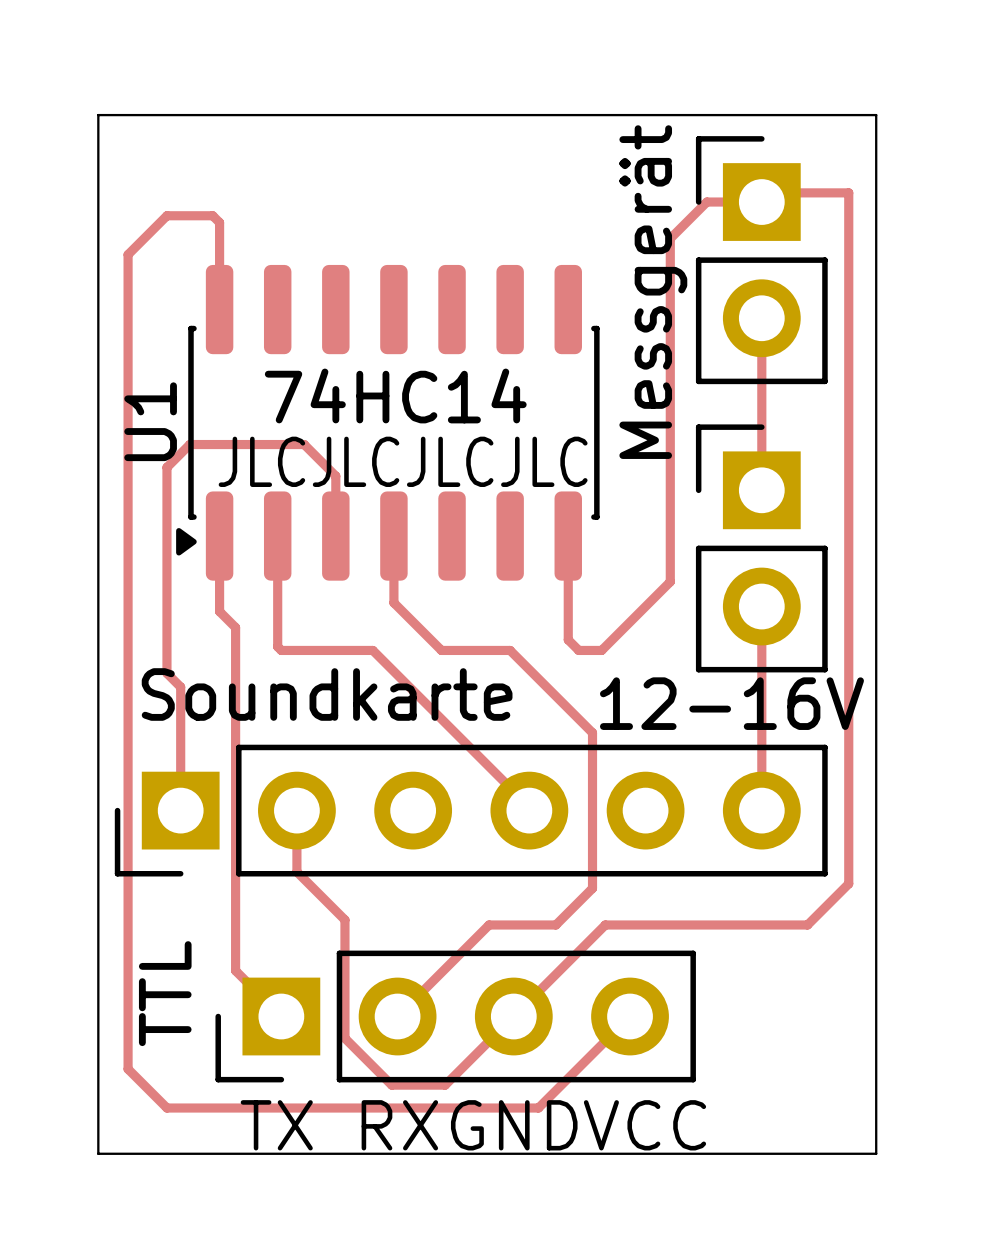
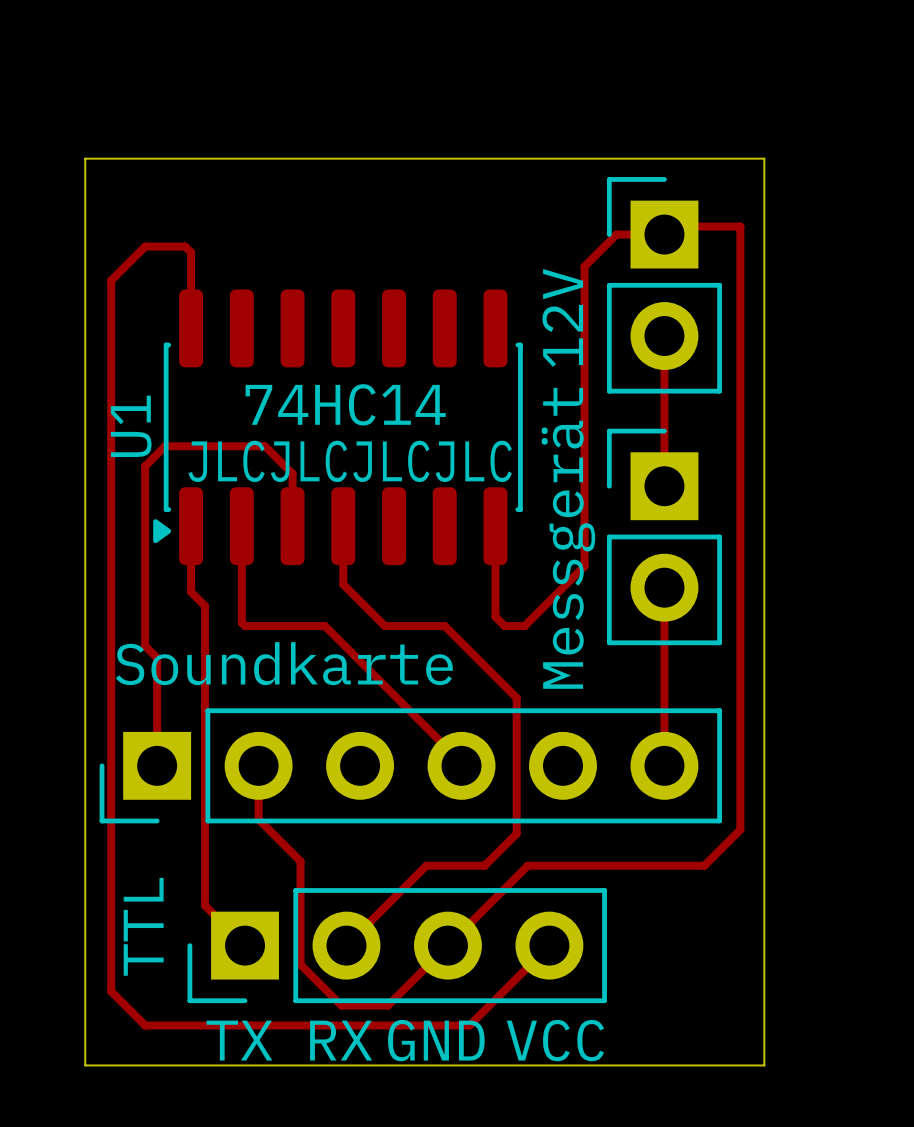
part value: Messgerät (653, 292) -> 12V (562, 317)
part value: 12-16V (731, 703) -> Messgerät (568, 538)

